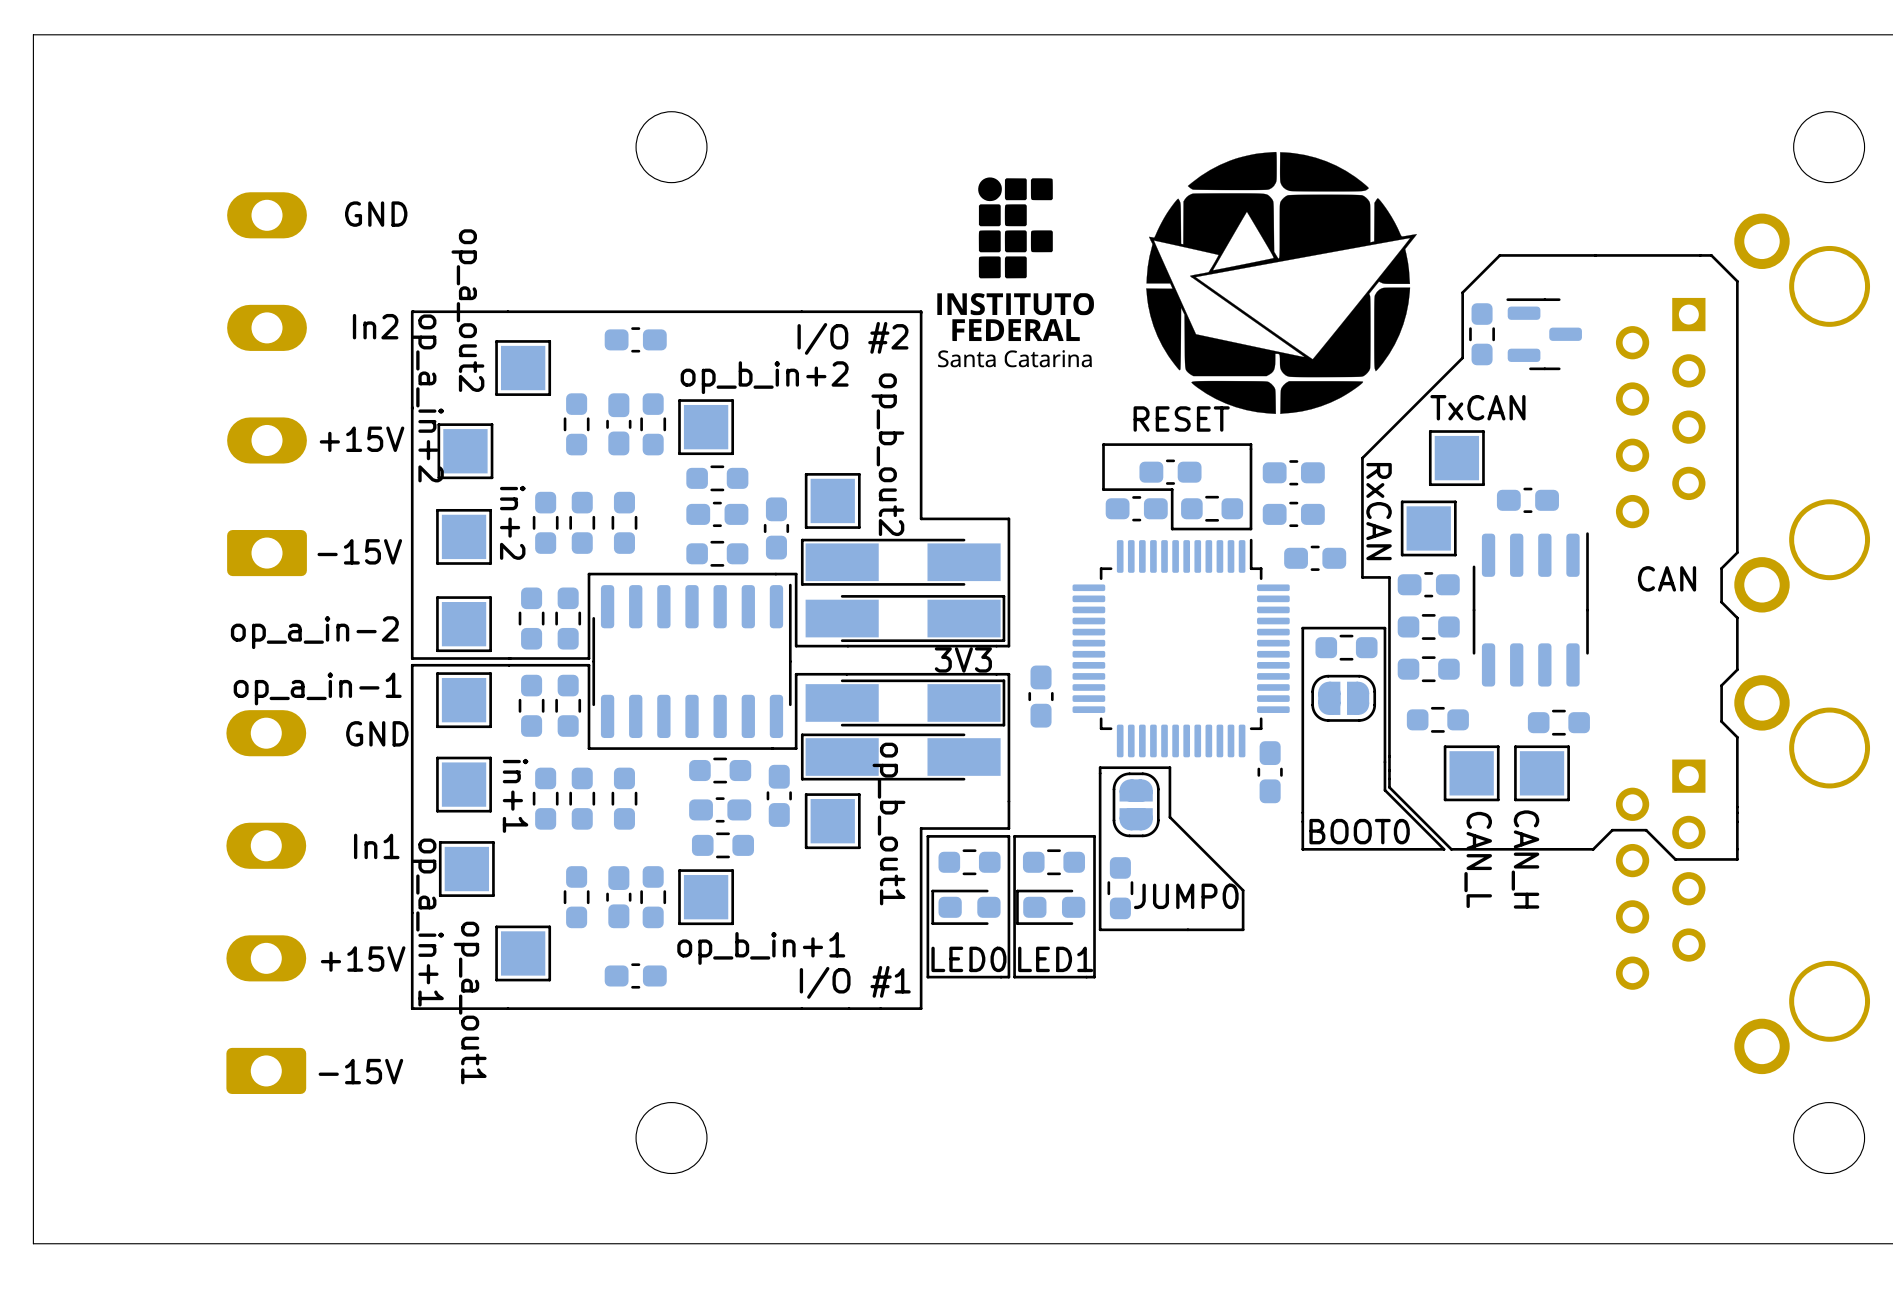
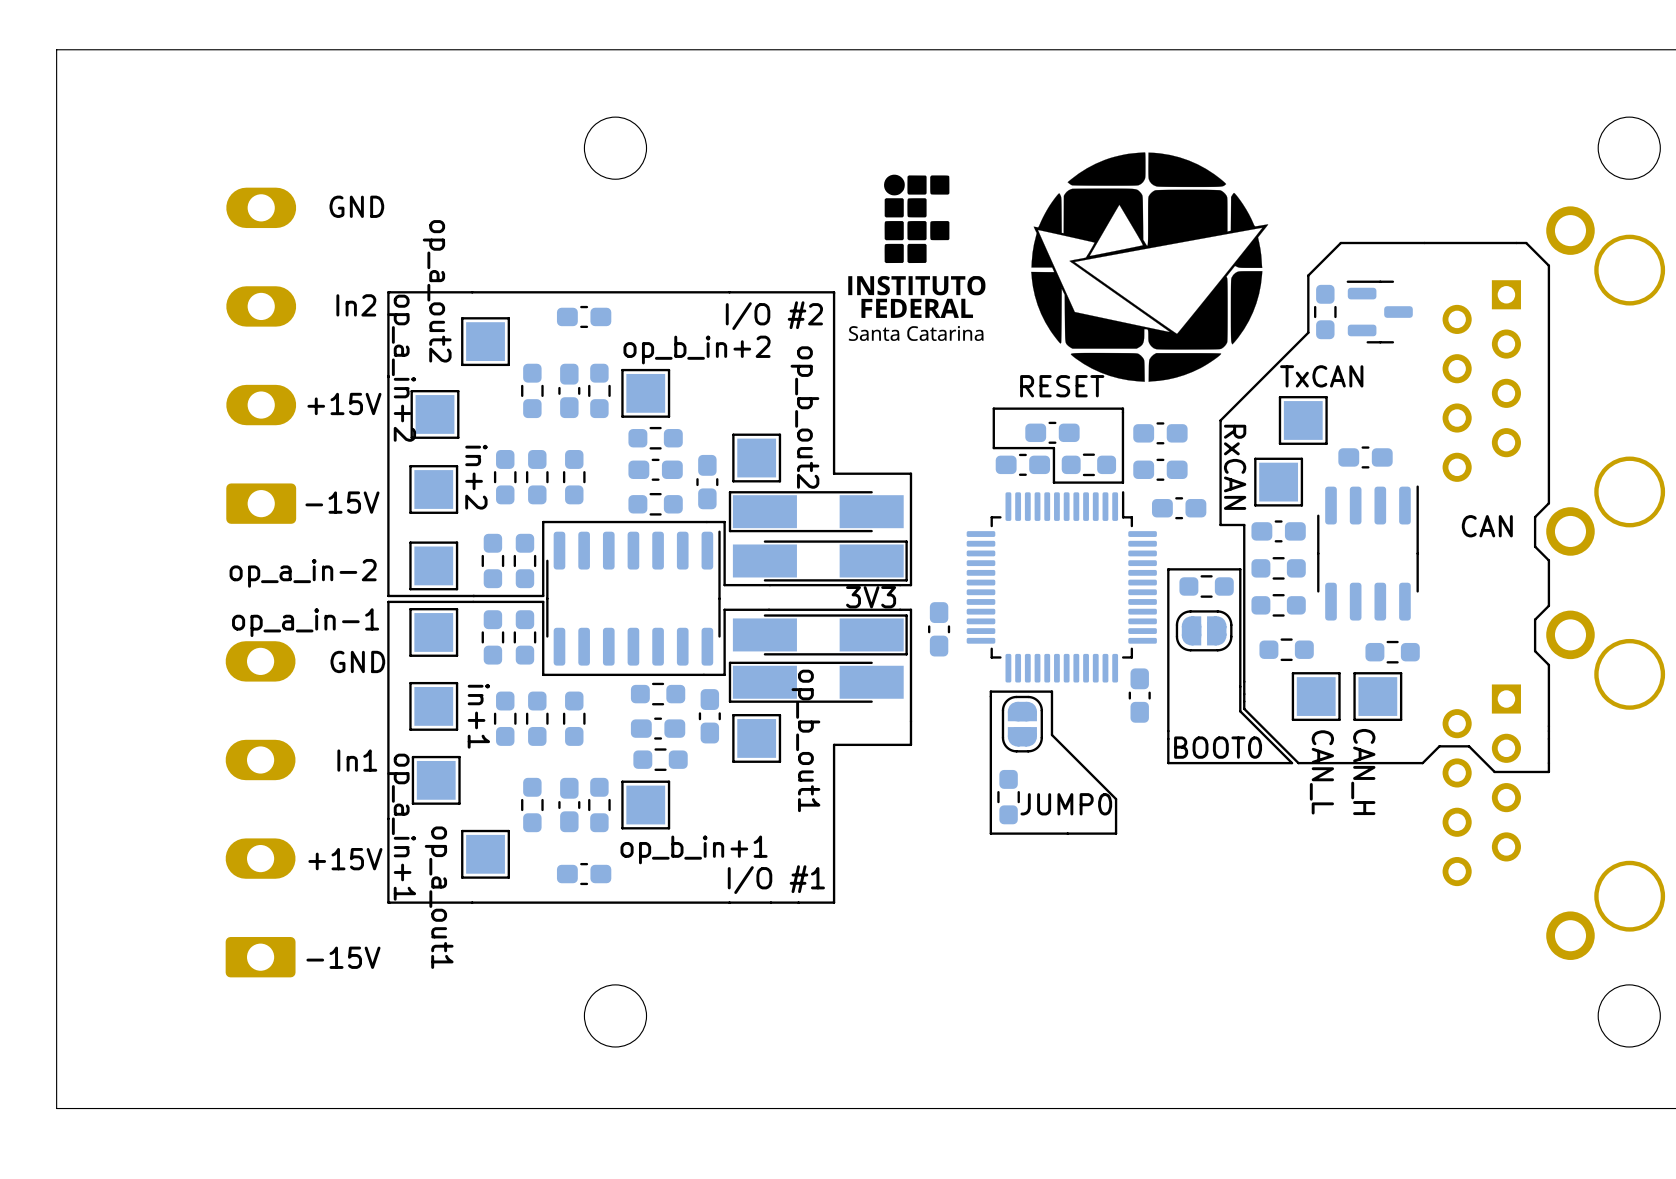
line: (1008, 836) (1008, 977) (927, 977) (927, 836) (1008, 836) -> none
line: (1094, 836) (1014, 836) (1014, 977) (1094, 977) (1094, 836) -> none
part: (969, 862) -> none
part: (1053, 862) -> none
part: (965, 907) -> none
part: (1050, 907) -> none
text: LED0 (968, 959) -> none
text: LED1 (1055, 959) -> none

